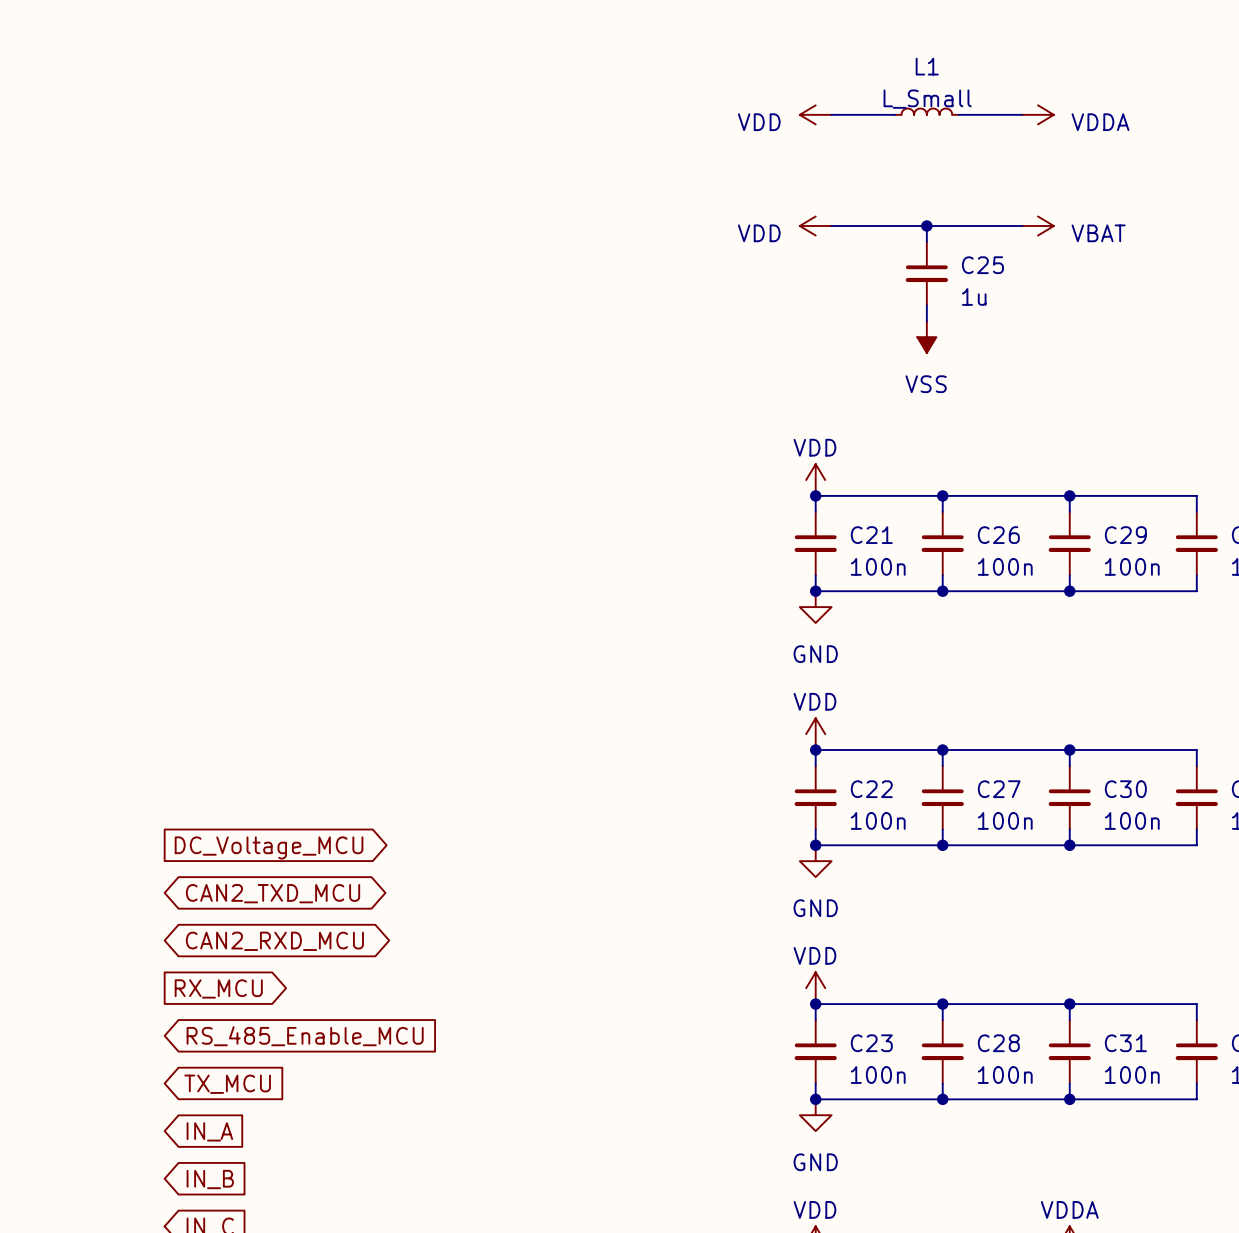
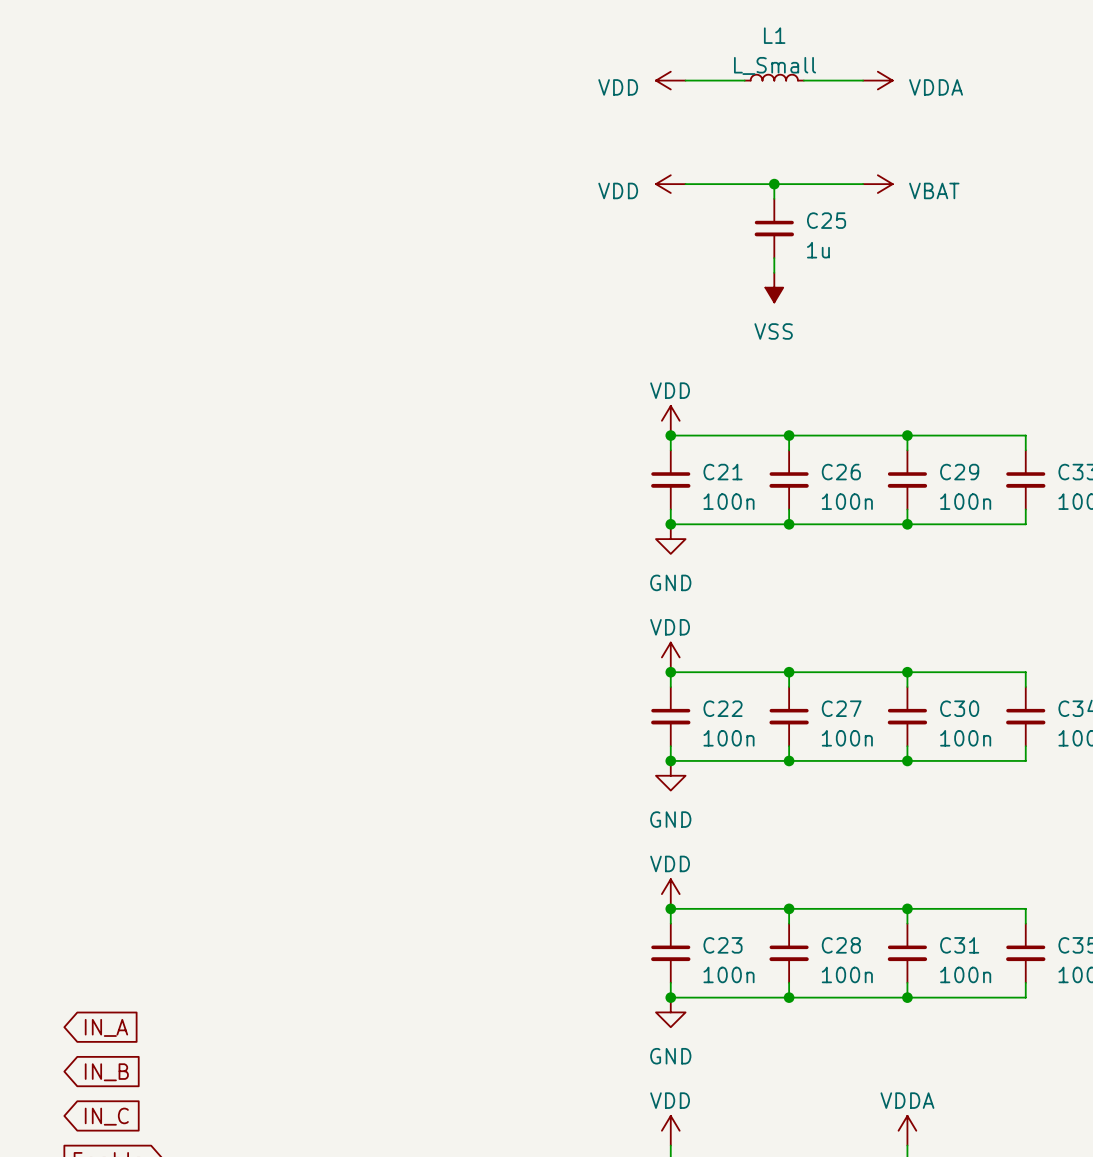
global label: DC_Voltage_MCU (269, 847) -> none
global label: CAN2_TXD_MCU (273, 893) -> none
global label: CAN2_RXD_MCU (274, 941) -> none
global label: RX_MCU (218, 988) -> none
global label: RS_485_Enable_MCU (305, 1036) -> none
global label: TX_MCU (227, 1084) -> none

